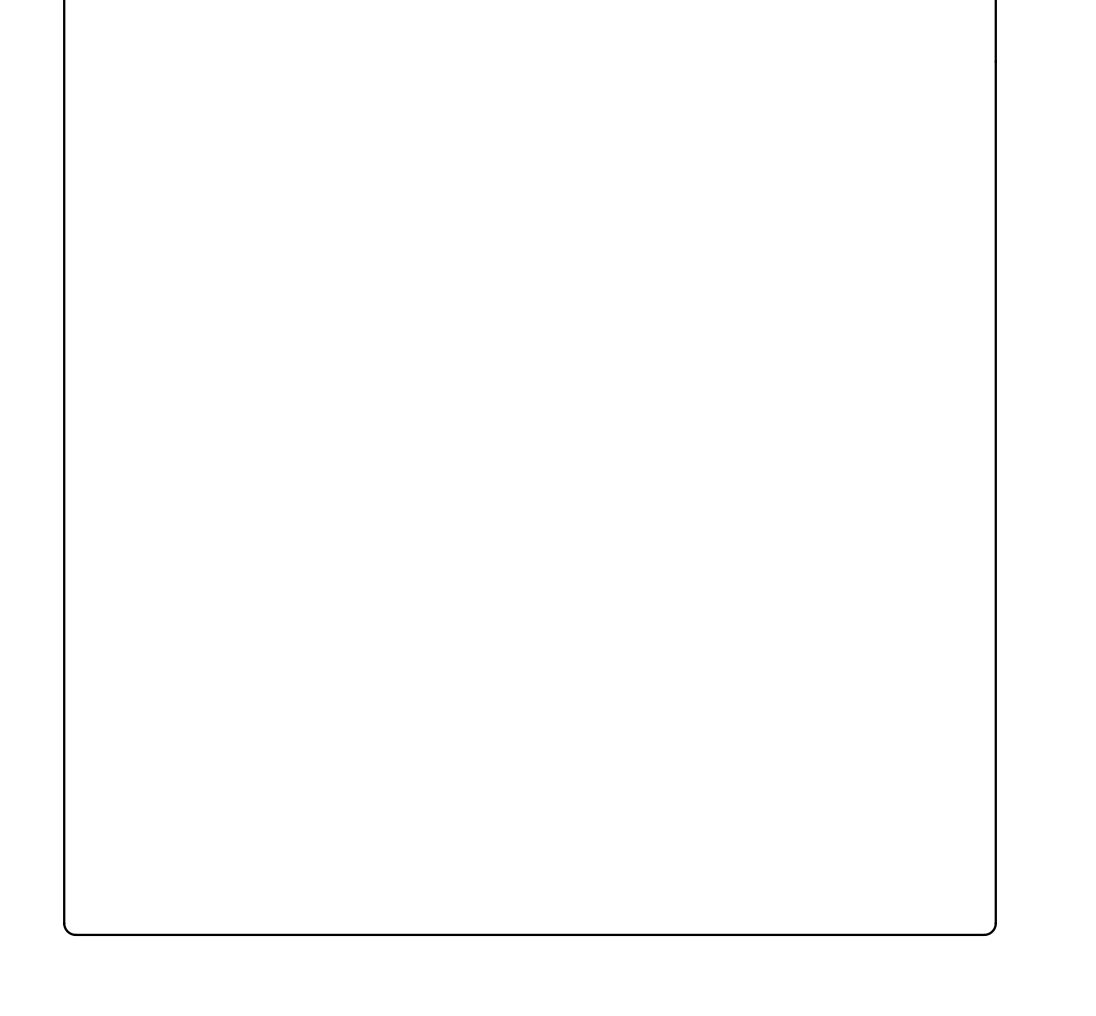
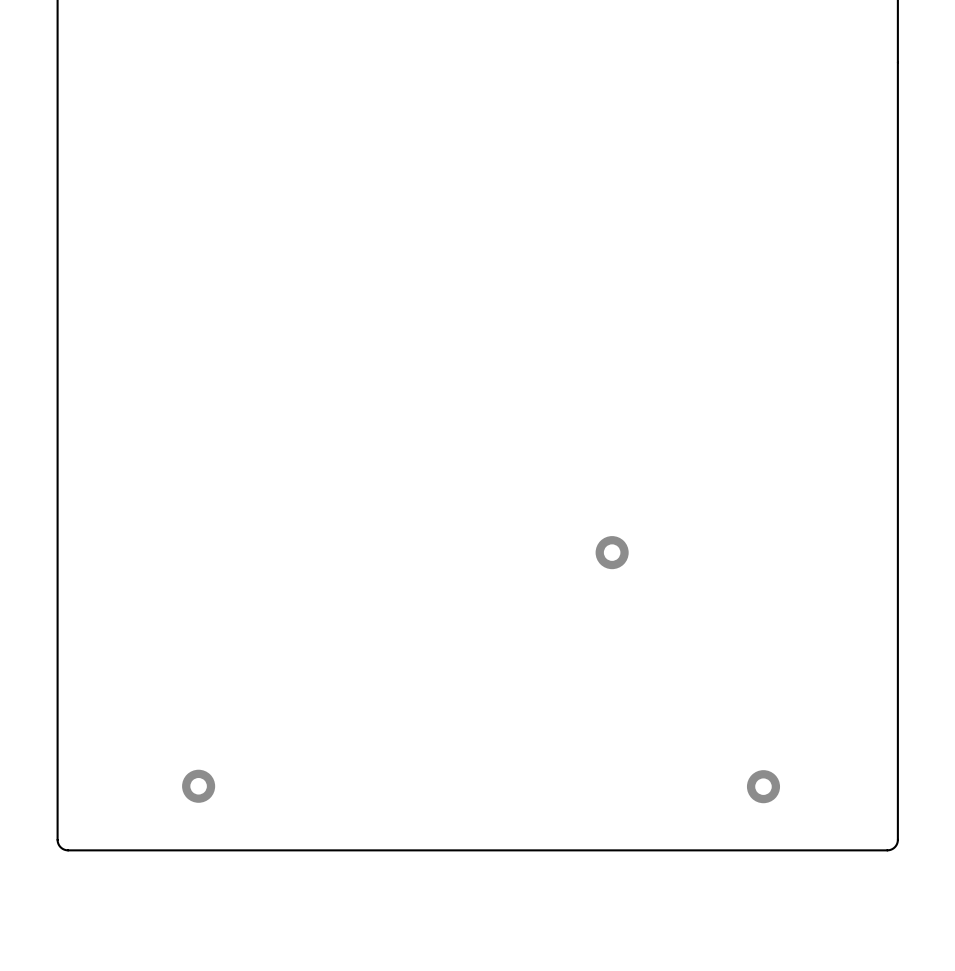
via: none -> (612, 552)
via: none -> (198, 786)
via: none -> (763, 786)

